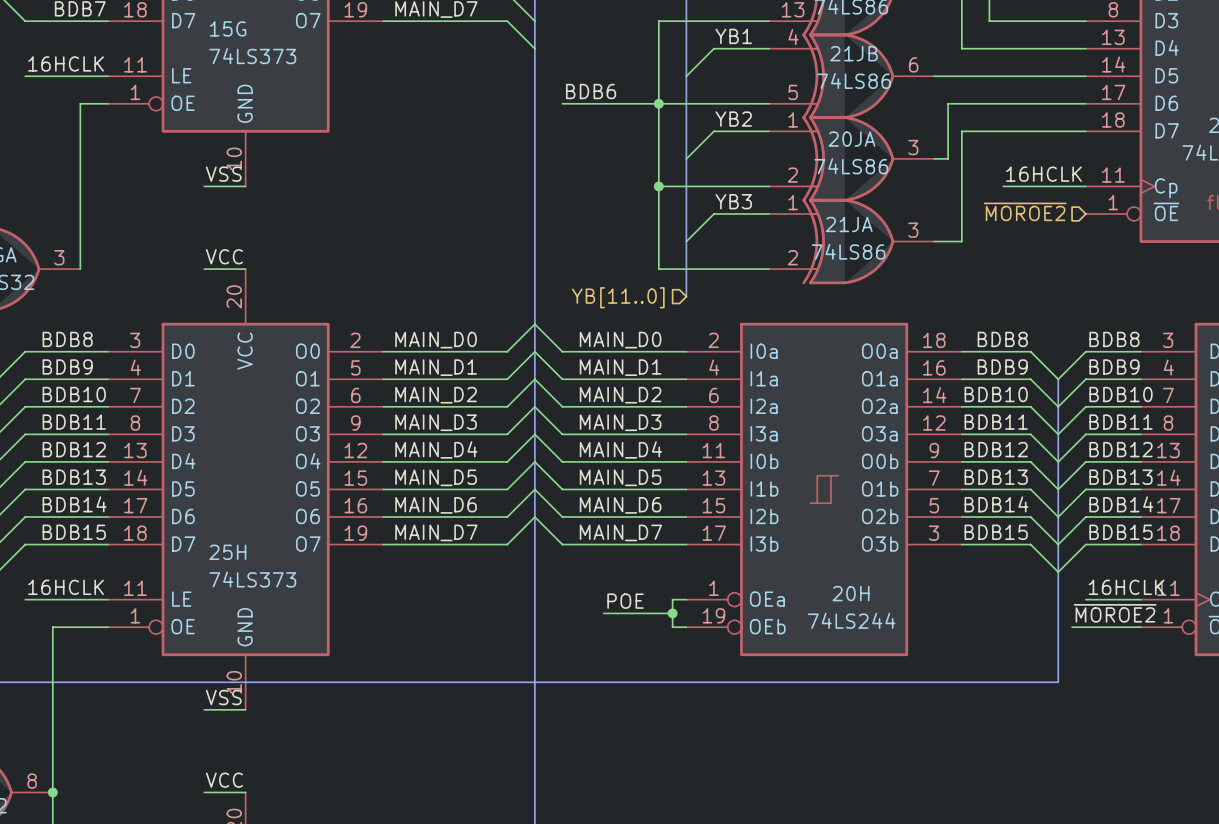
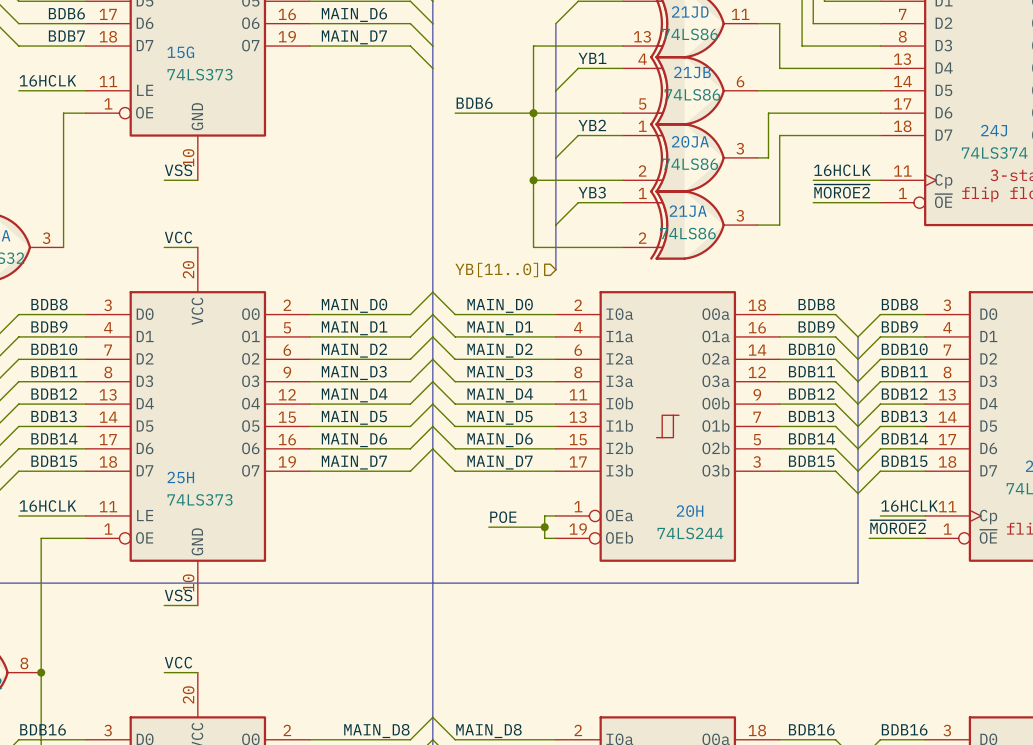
label: none -> ~{MOROE2} (842, 191)
hierarchical label: ~{MOROE2} (1025, 211) -> none
wire: none -> (813, 202) (880, 202)

